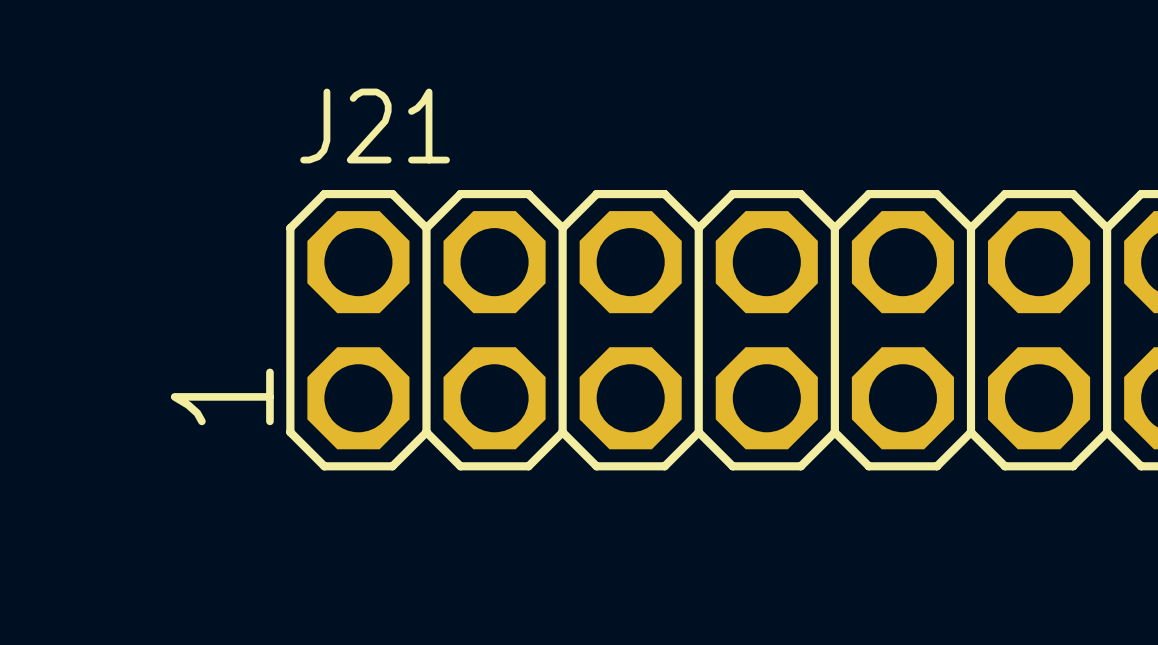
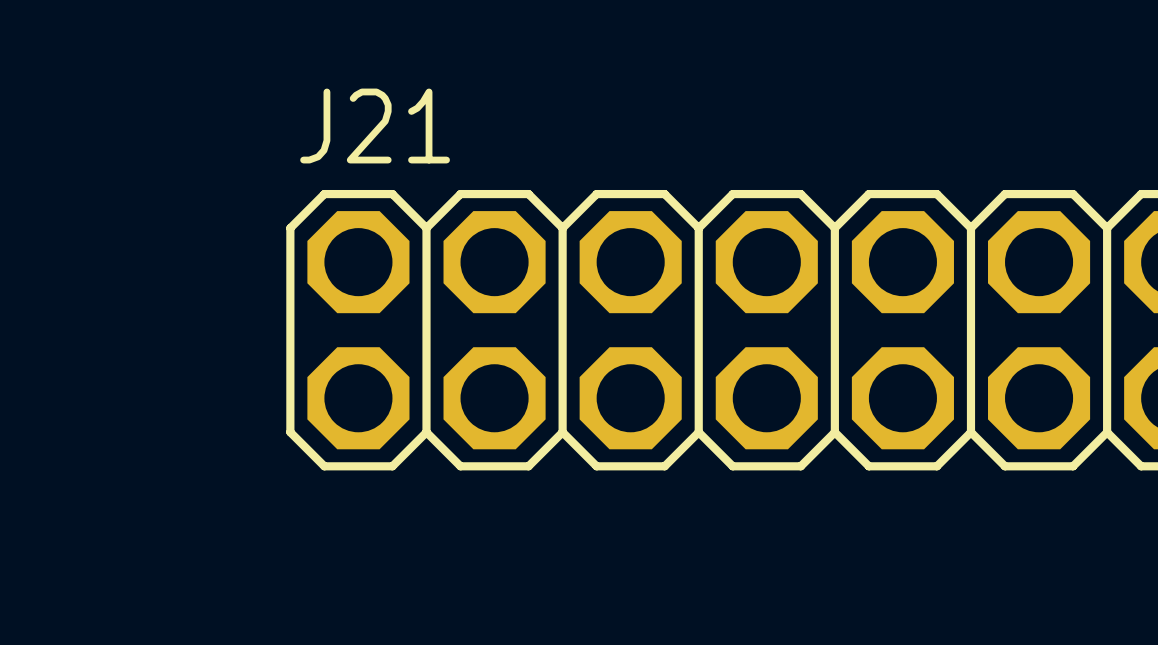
text: 1 (222, 396) -> none

